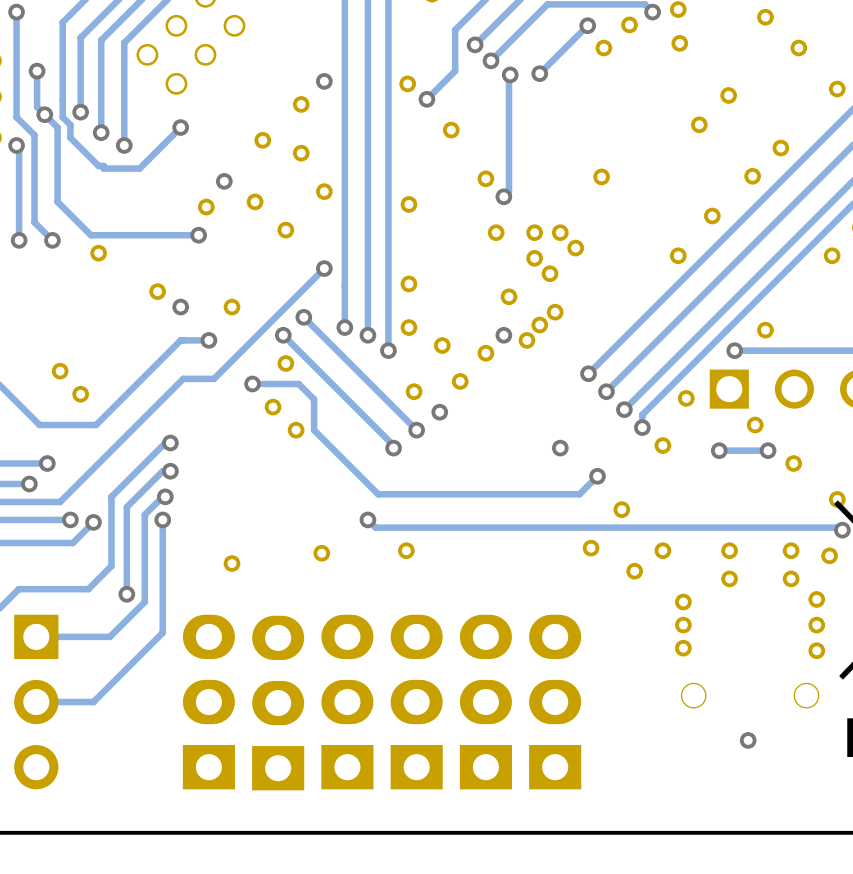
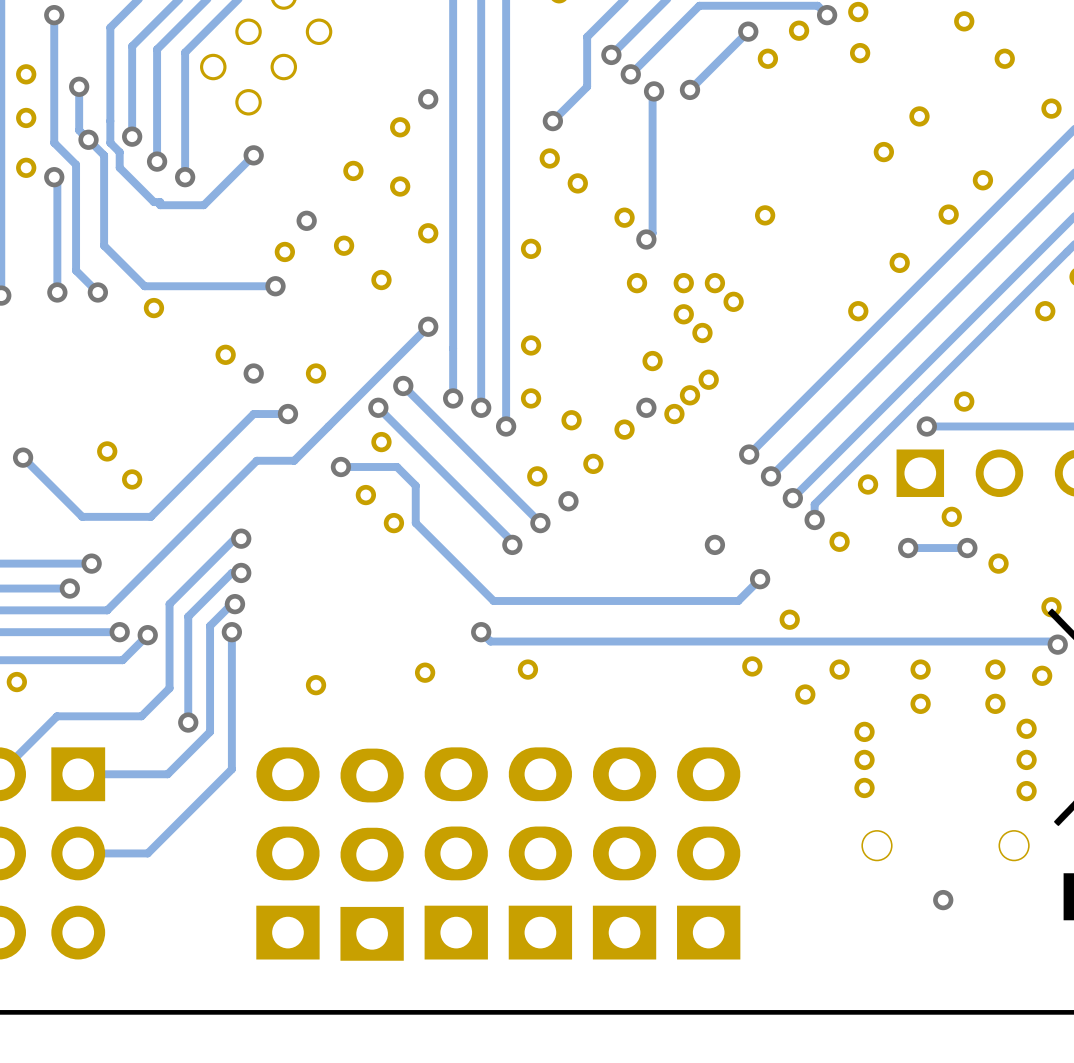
part: (407, 83) -> none
part: none -> (549, 158)
part: (451, 130) -> none
part: none -> (577, 183)

